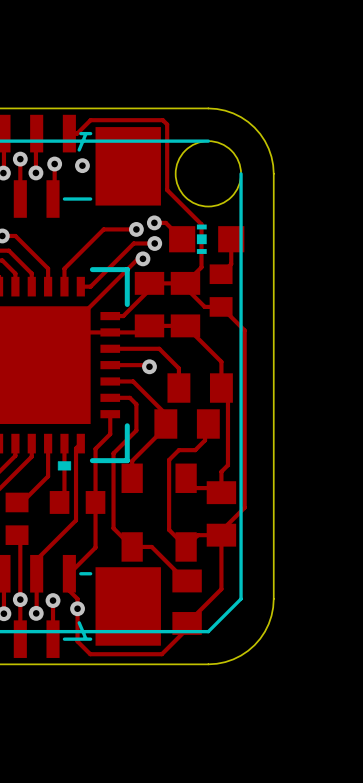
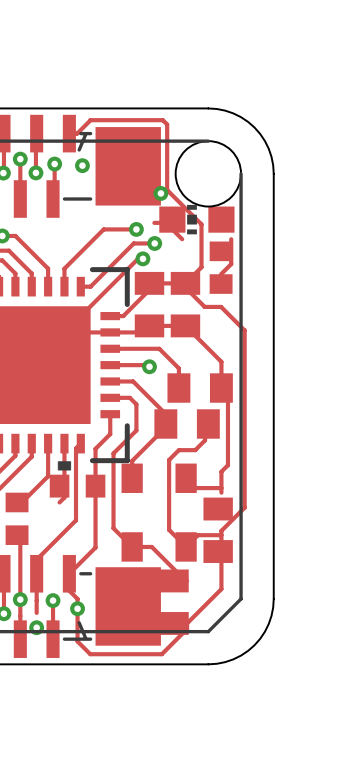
via position: (154, 222) -> (160, 193)
part position: (206, 239) -> (196, 219)
part position: (221, 290) -> (221, 267)
part position: (77, 502) -> (77, 486)
part position: (221, 513) -> (218, 530)
part position: (187, 602) -> (174, 602)
via position: (36, 613) -> (36, 627)

